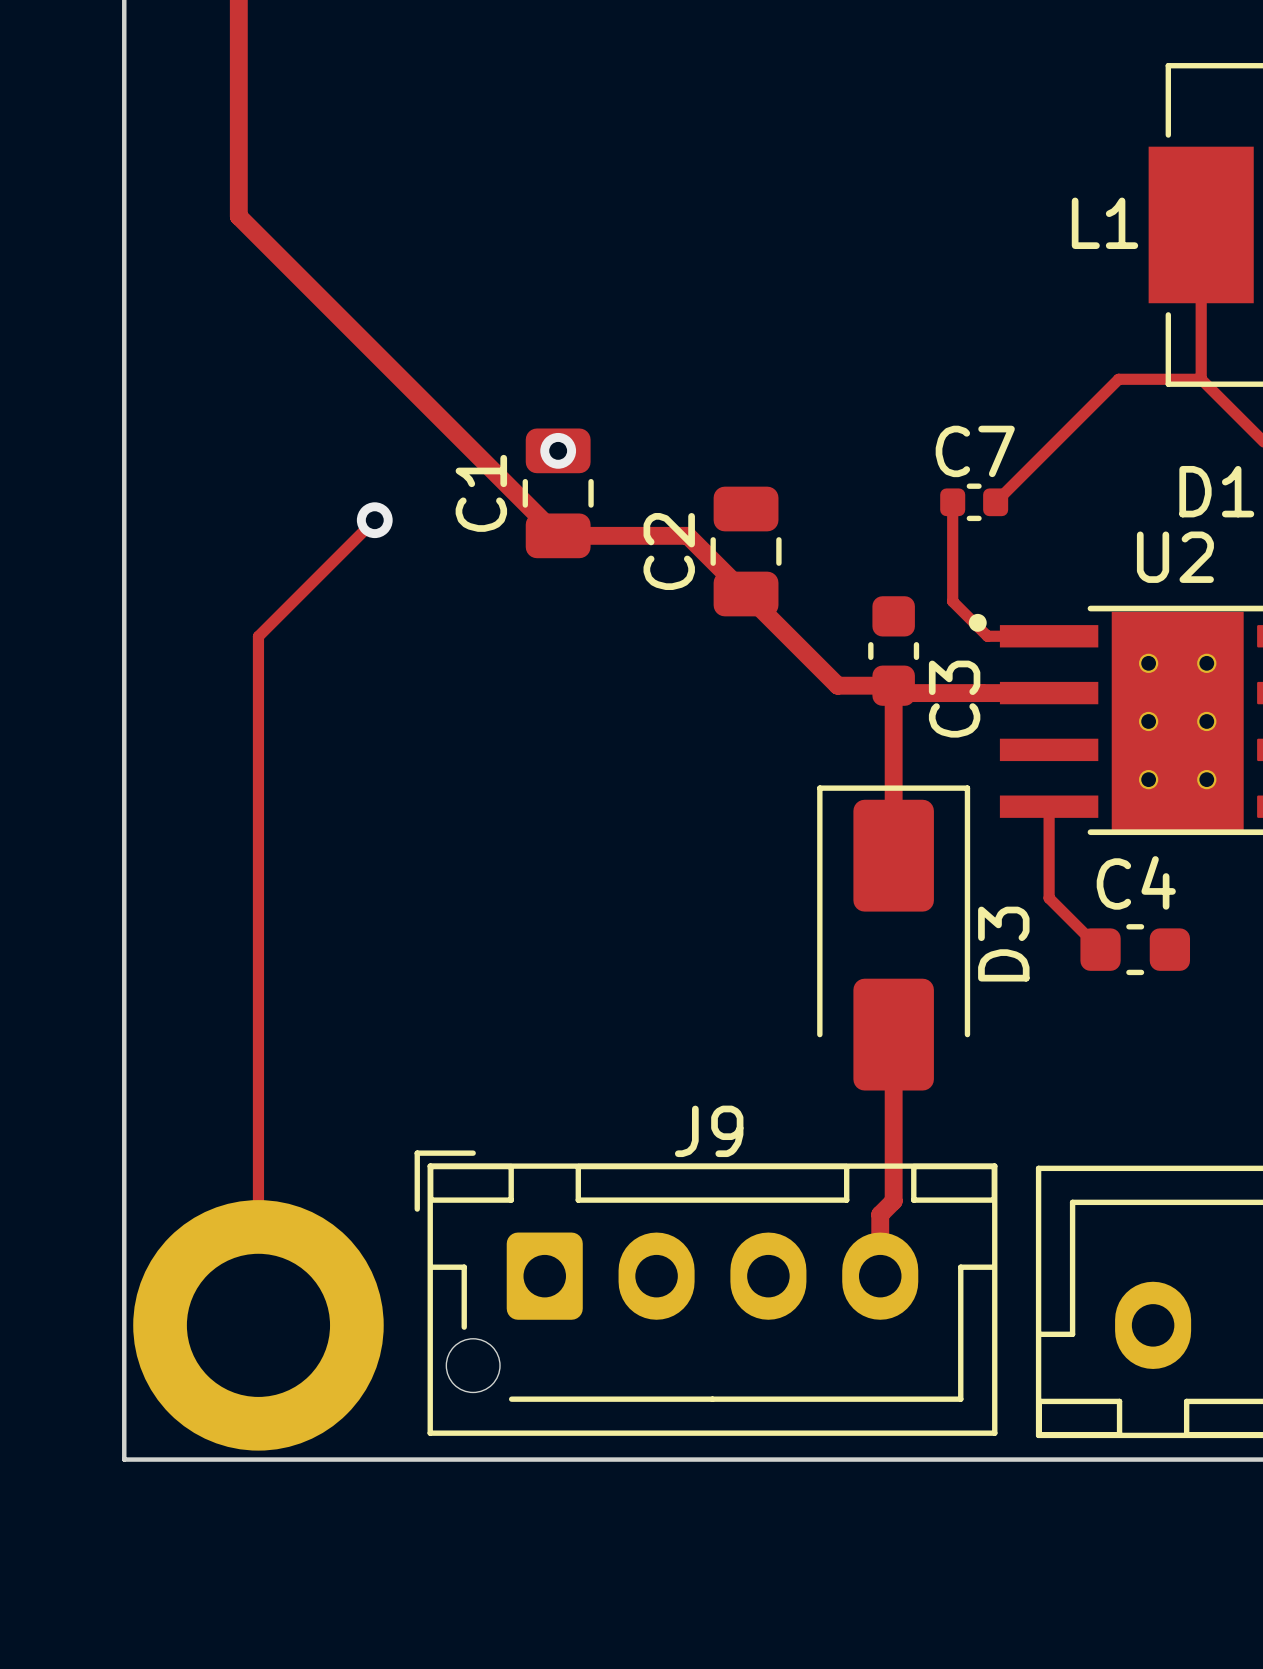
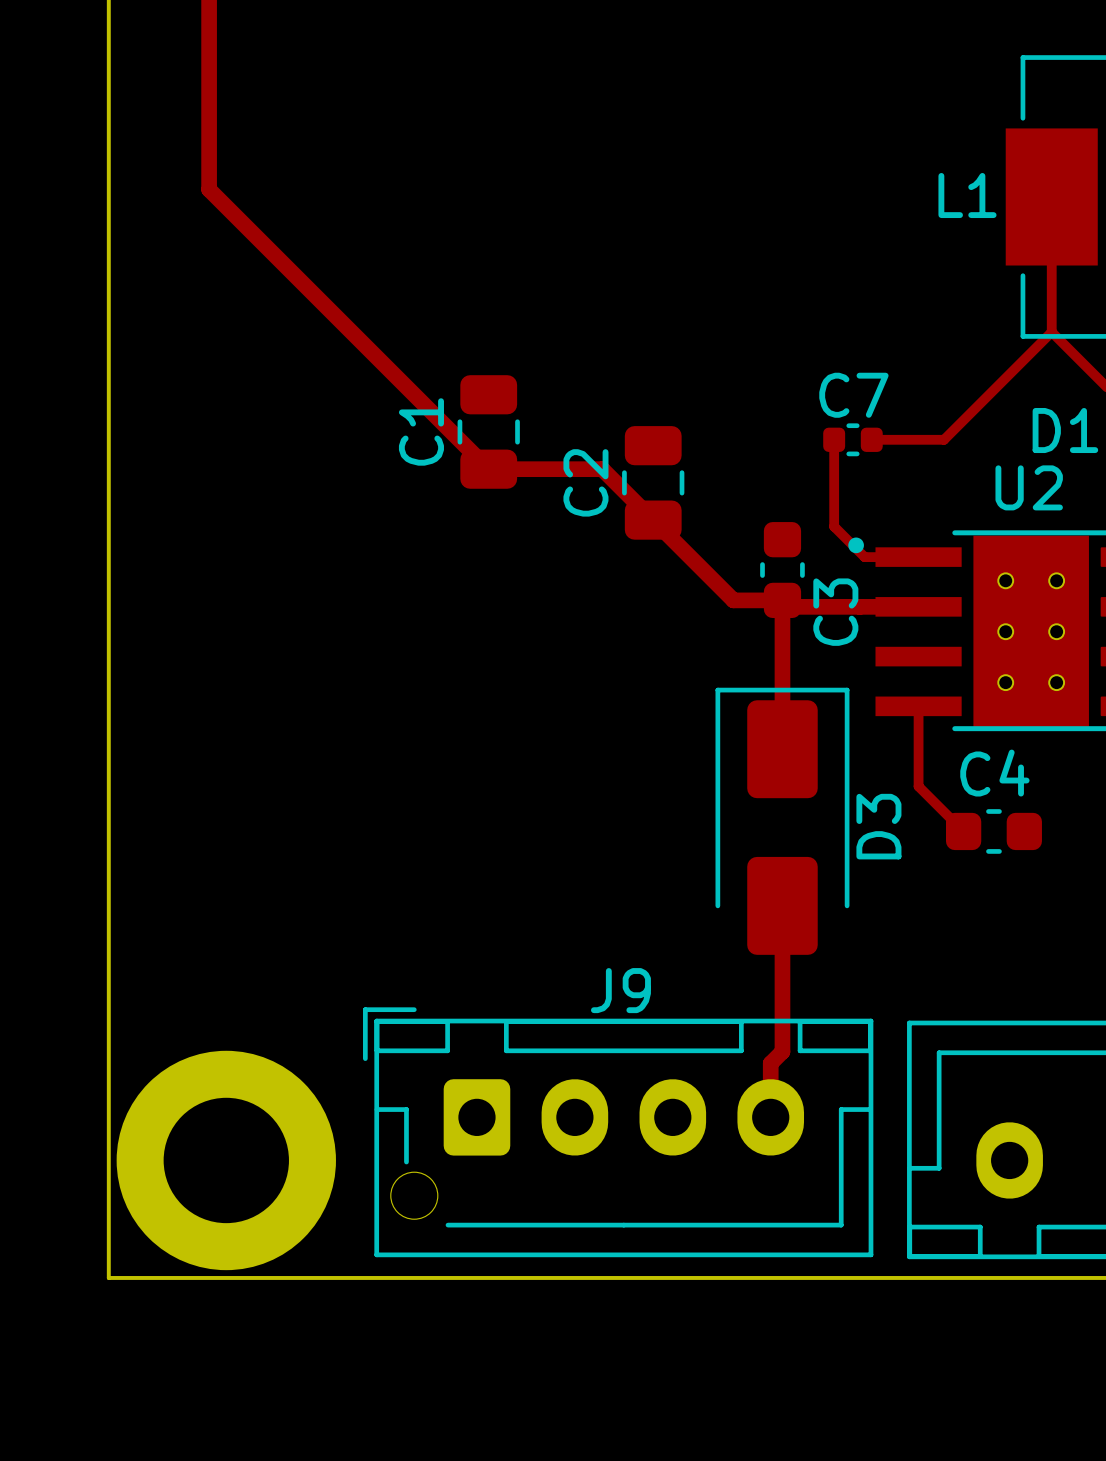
track: (1201, 379) (1118, 379) (995, 502) -> (1051, 332) (944, 439) (871, 439)
via: (558, 450) -> none
track: (374, 520) (258, 636) (258, 1325) -> none
via: (374, 520) -> none

